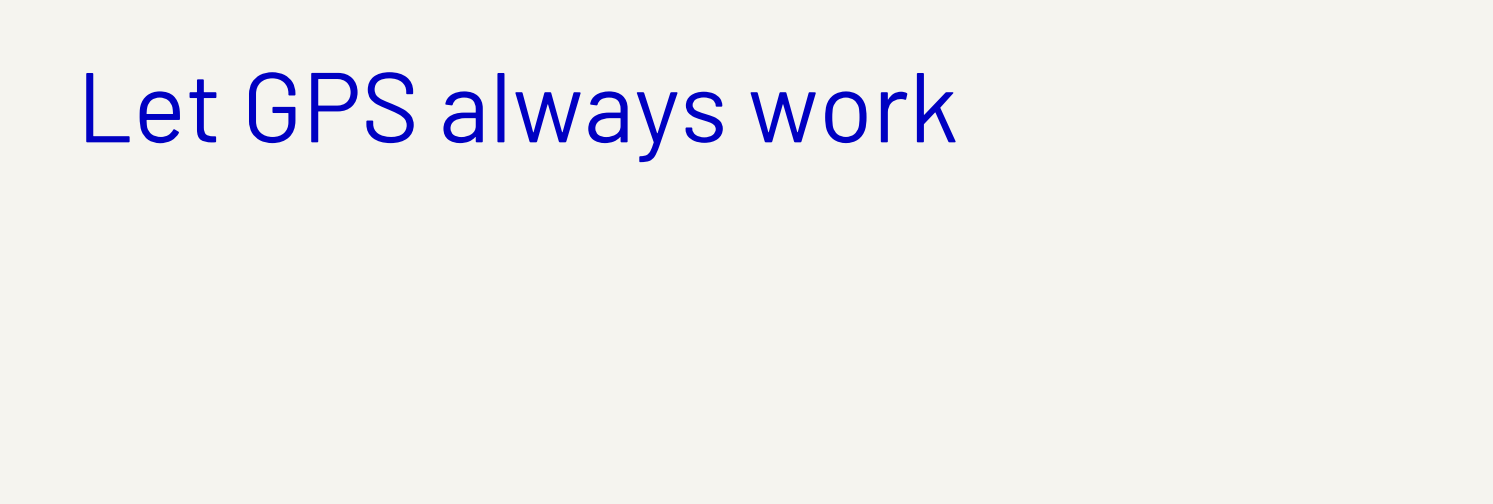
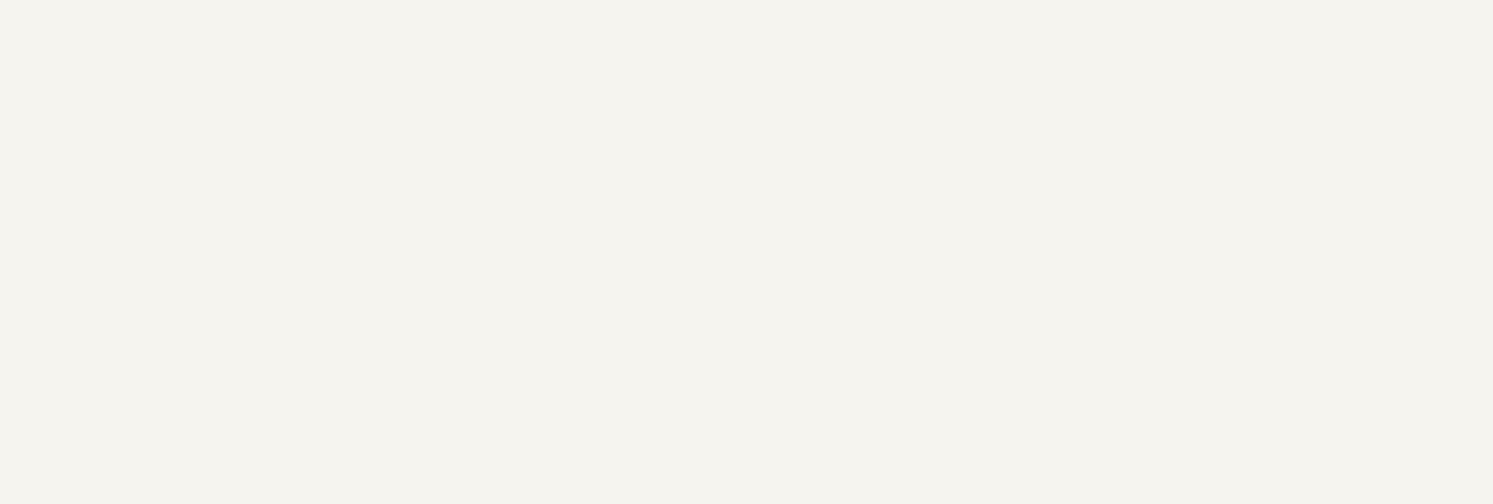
text: Let GPS always work (520, 117) -> none

